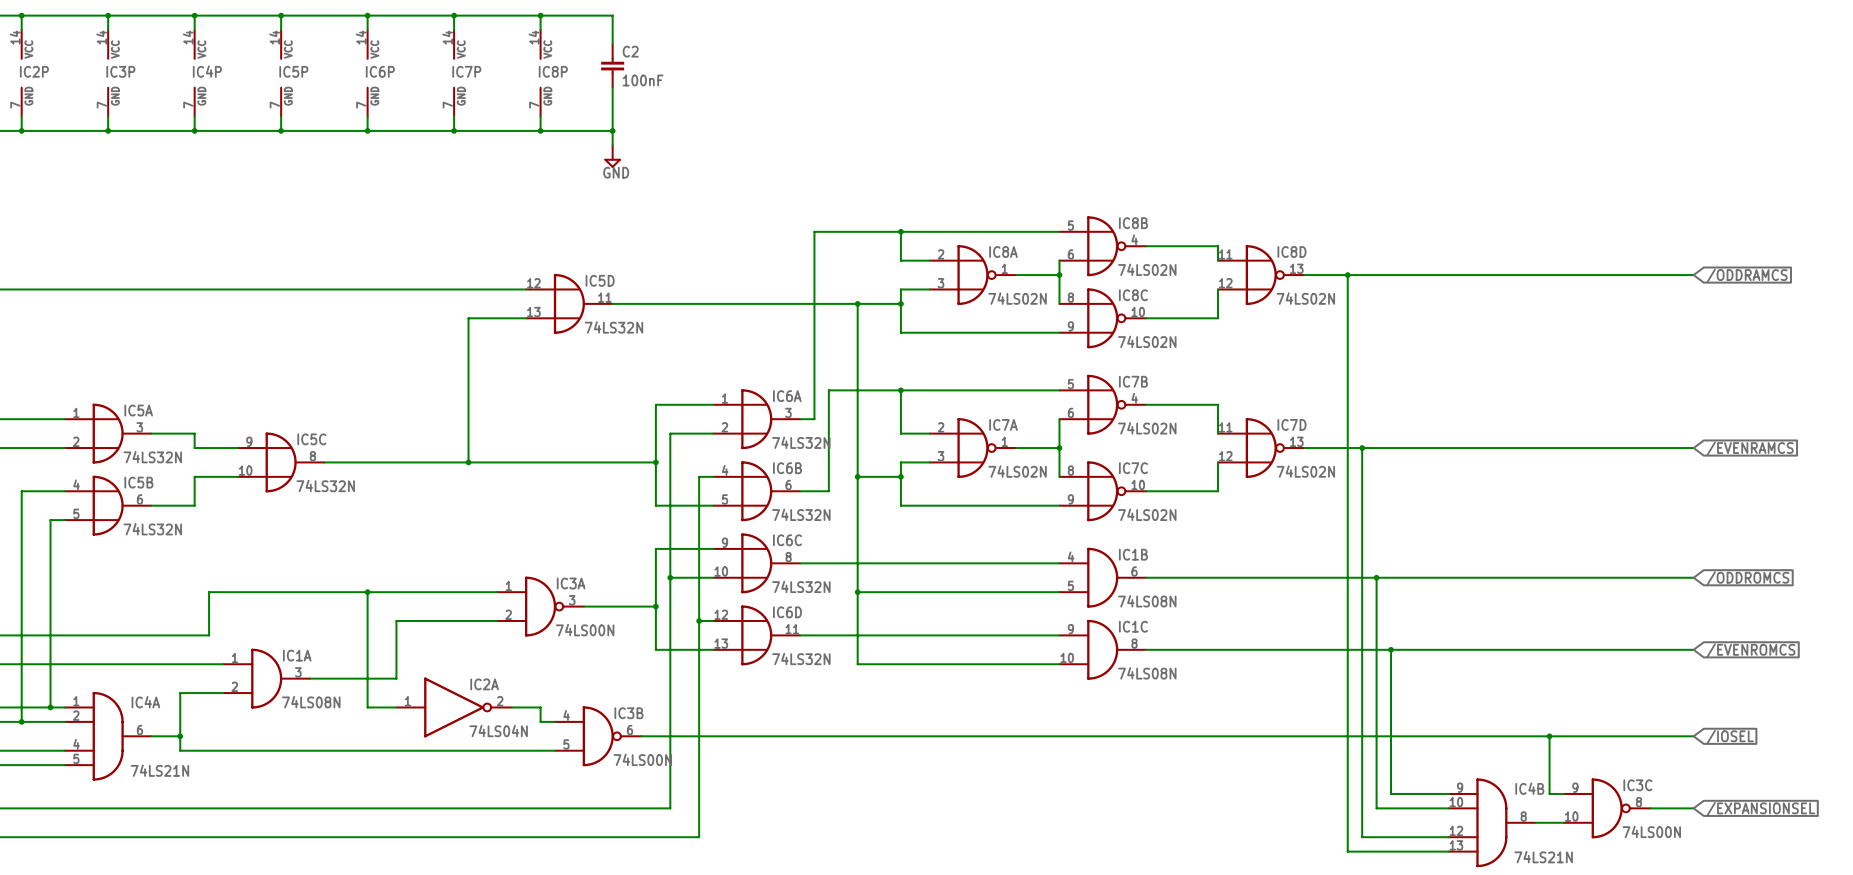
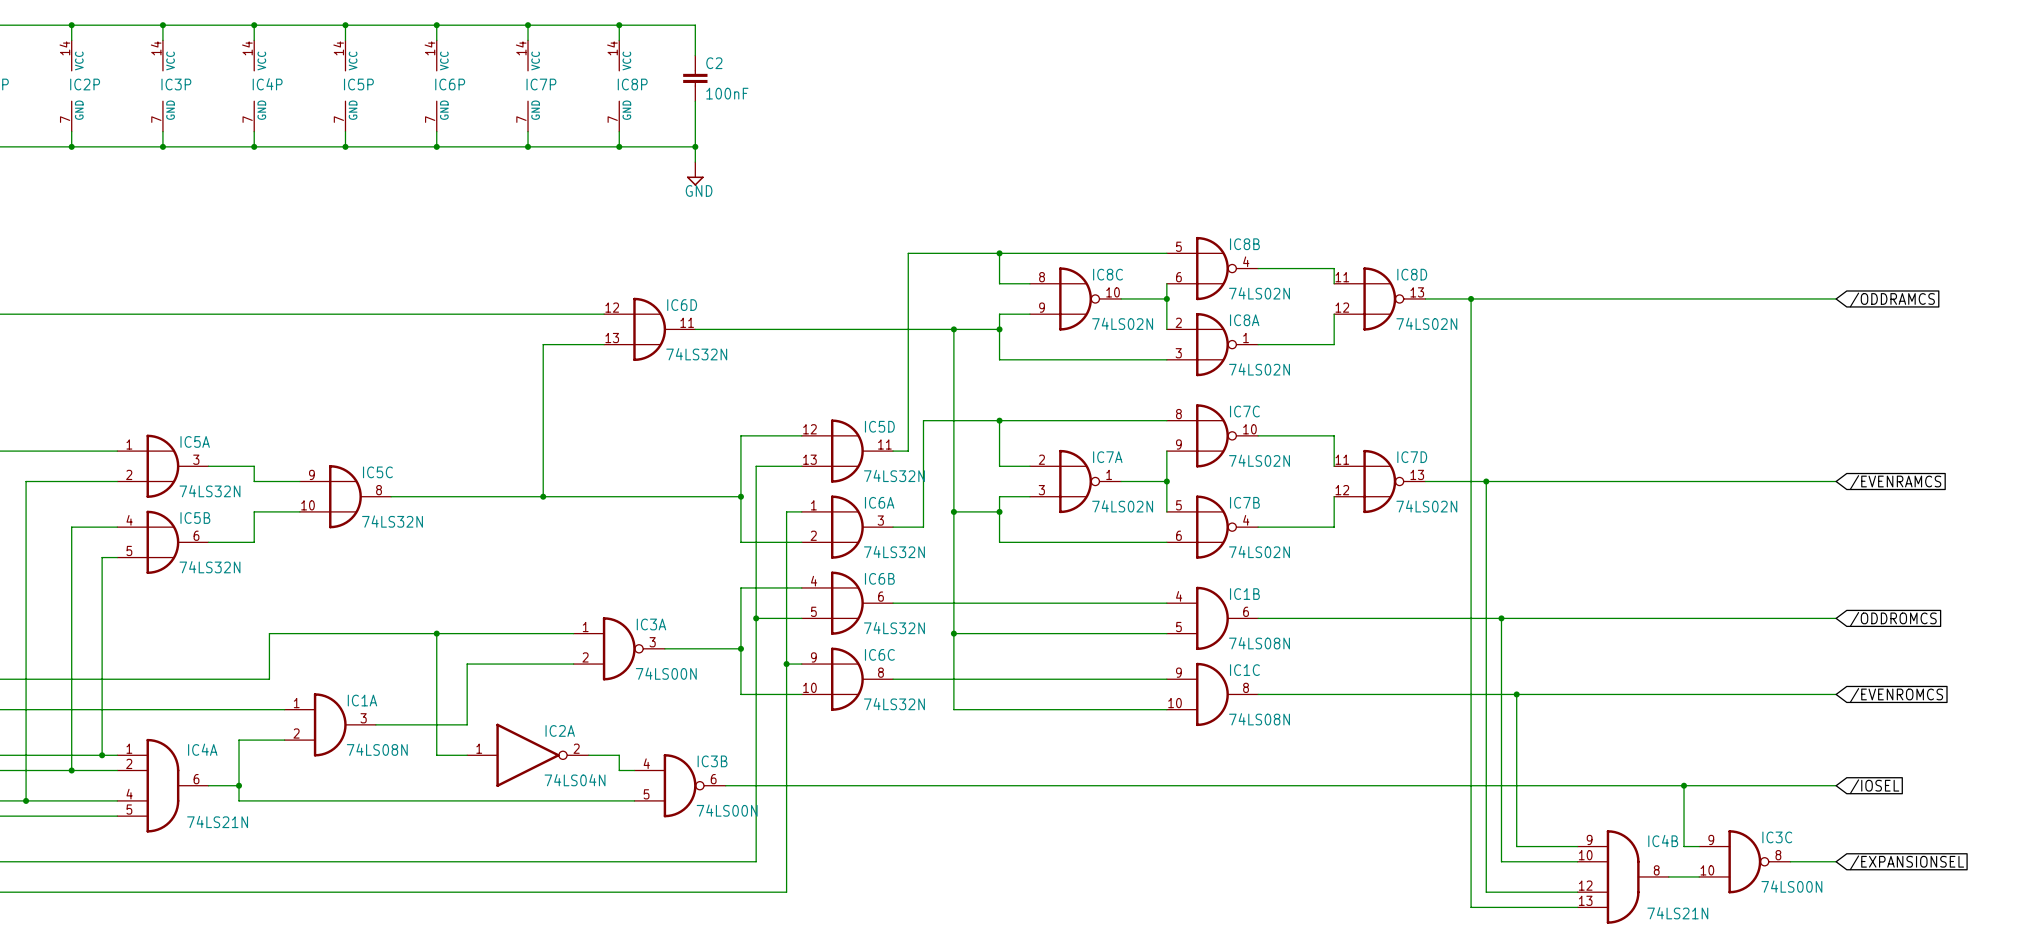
IC8A position: (973, 275) -> (1212, 344)
IC5D name: IC5D (600, 280) -> IC6D (682, 305)
IC8C position: (1102, 318) -> (1075, 298)
IC7B position: (1102, 404) -> (1212, 527)
IC6A position: (756, 419) -> (847, 527)
IC5D: none -> 74LS32N (847, 451)
IC6B position: (756, 491) -> (847, 603)
IC7C position: (1102, 491) -> (1212, 435)
IC6C position: (756, 563) -> (847, 679)
IC6D: 74LS32N (756, 635) -> none

